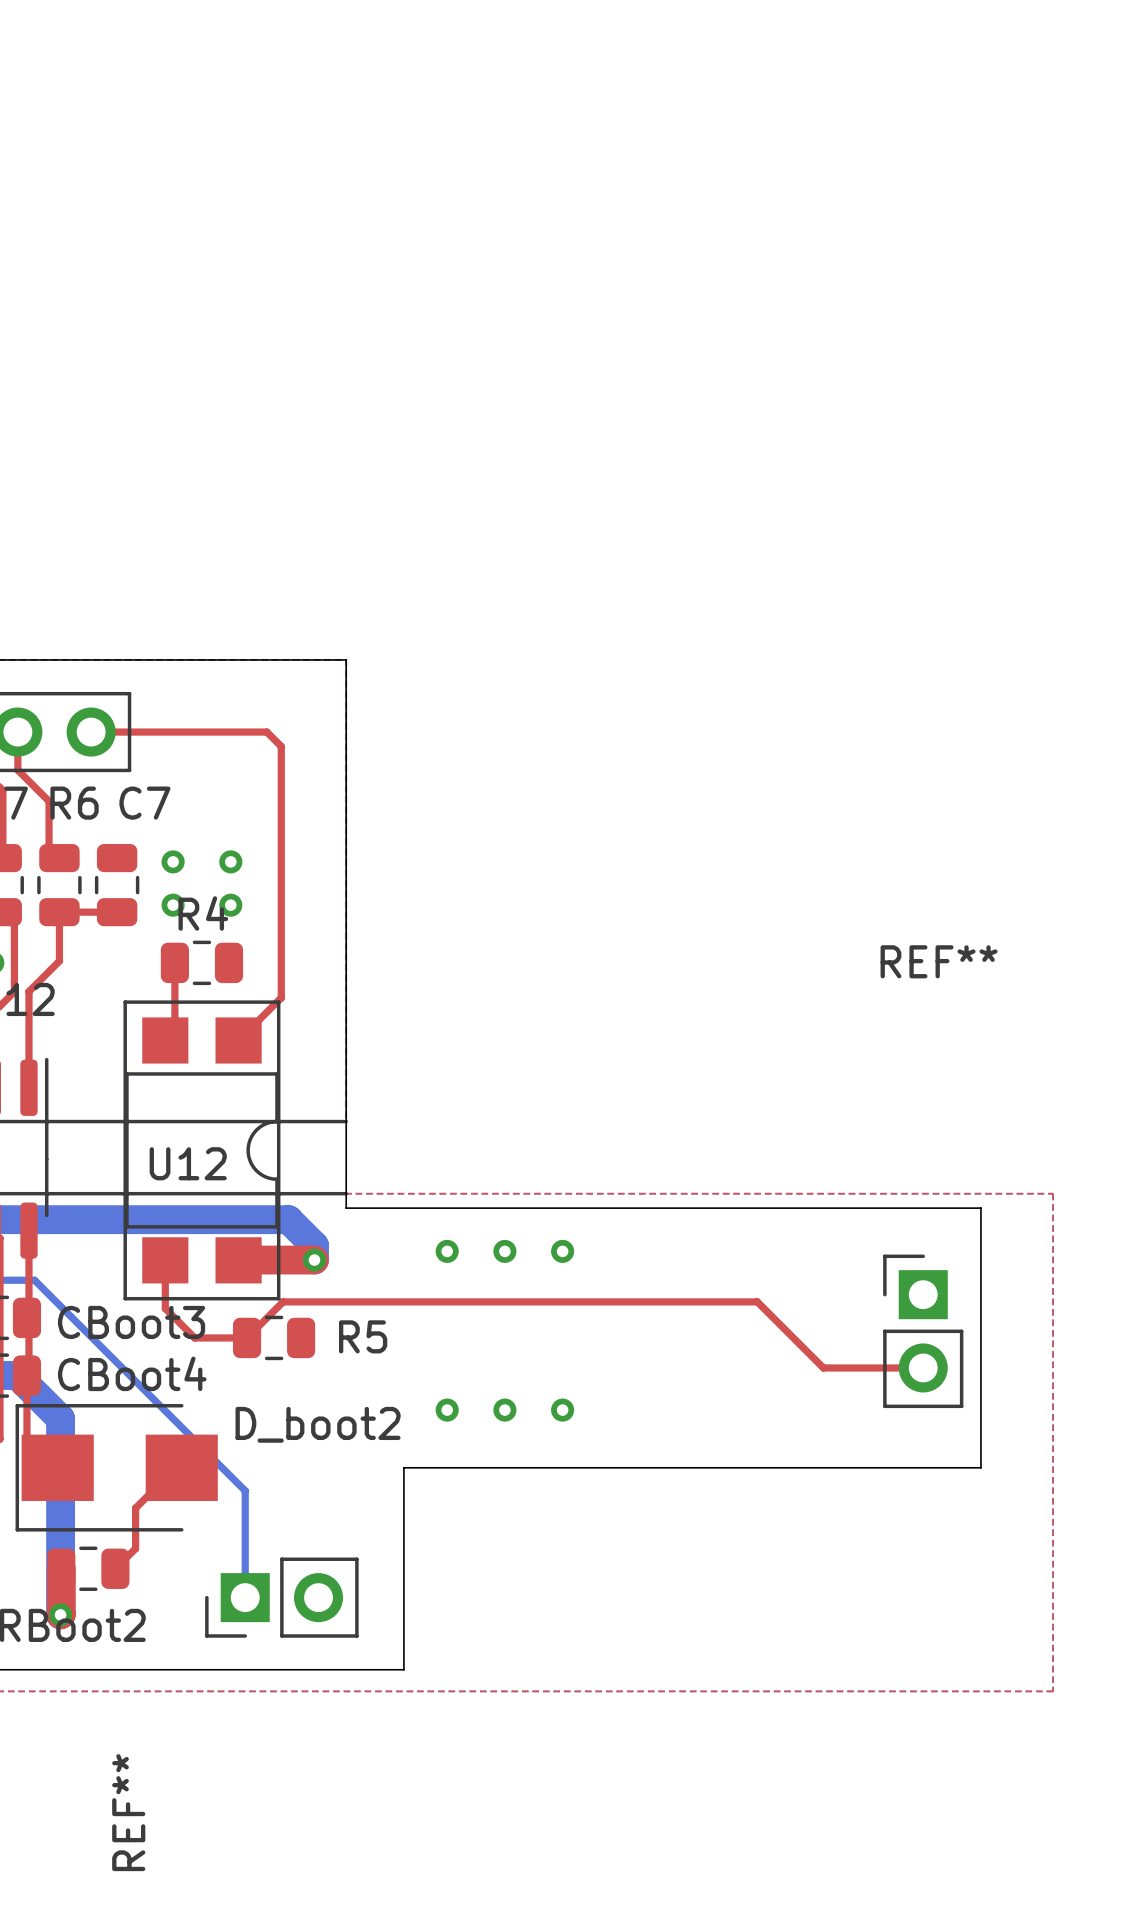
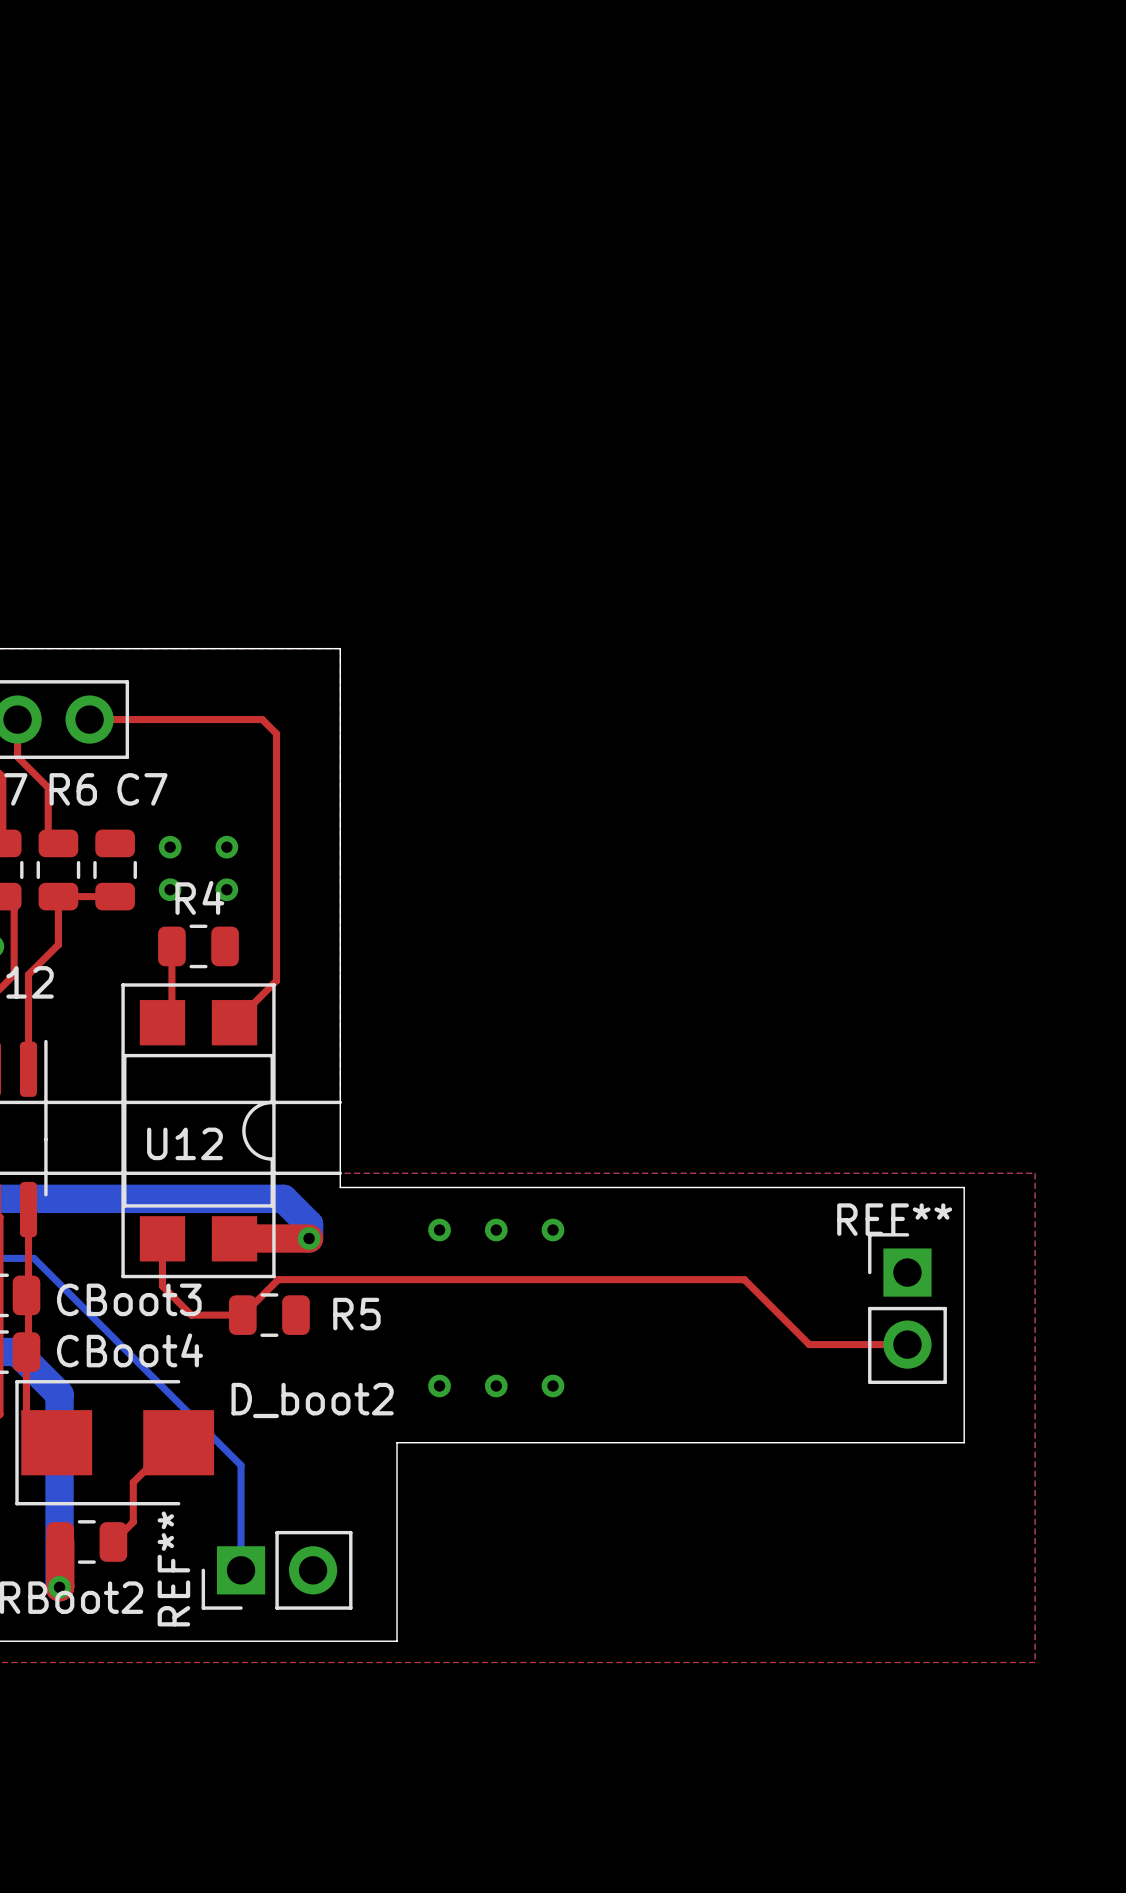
part text position: REF** (939, 961) -> REF** (894, 1219)
part text position: REF** (128, 1812) -> REF** (173, 1568)

